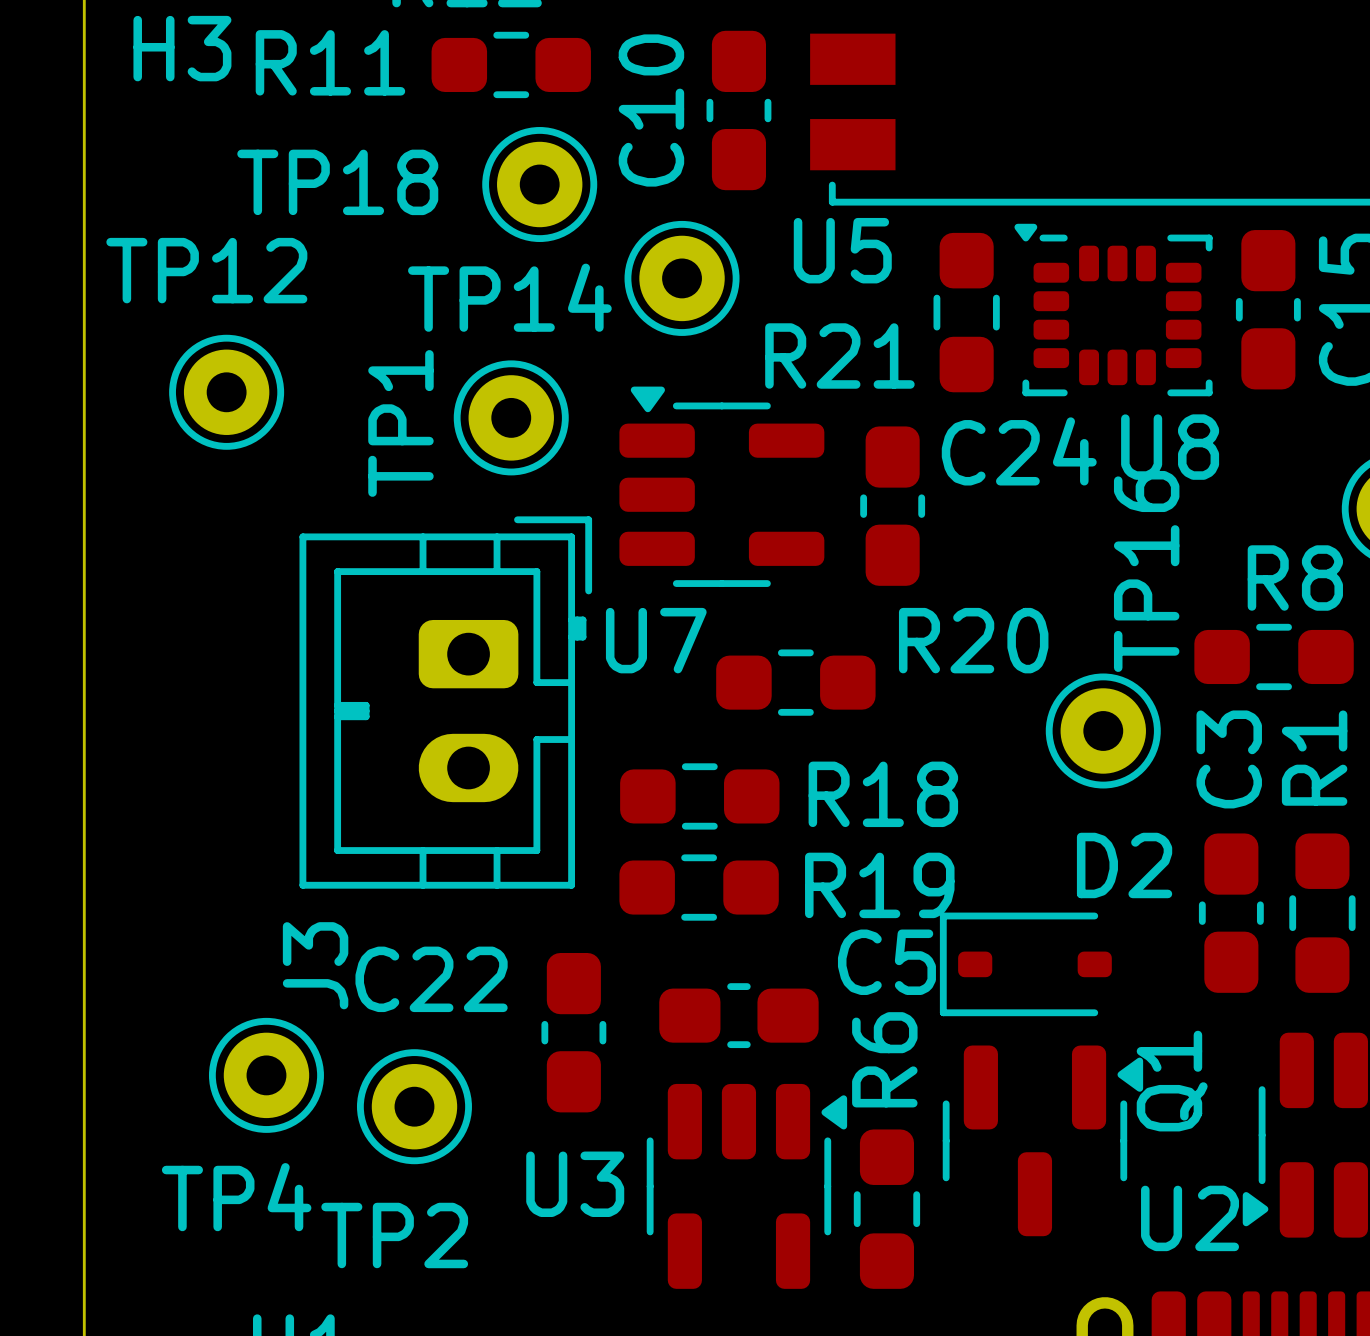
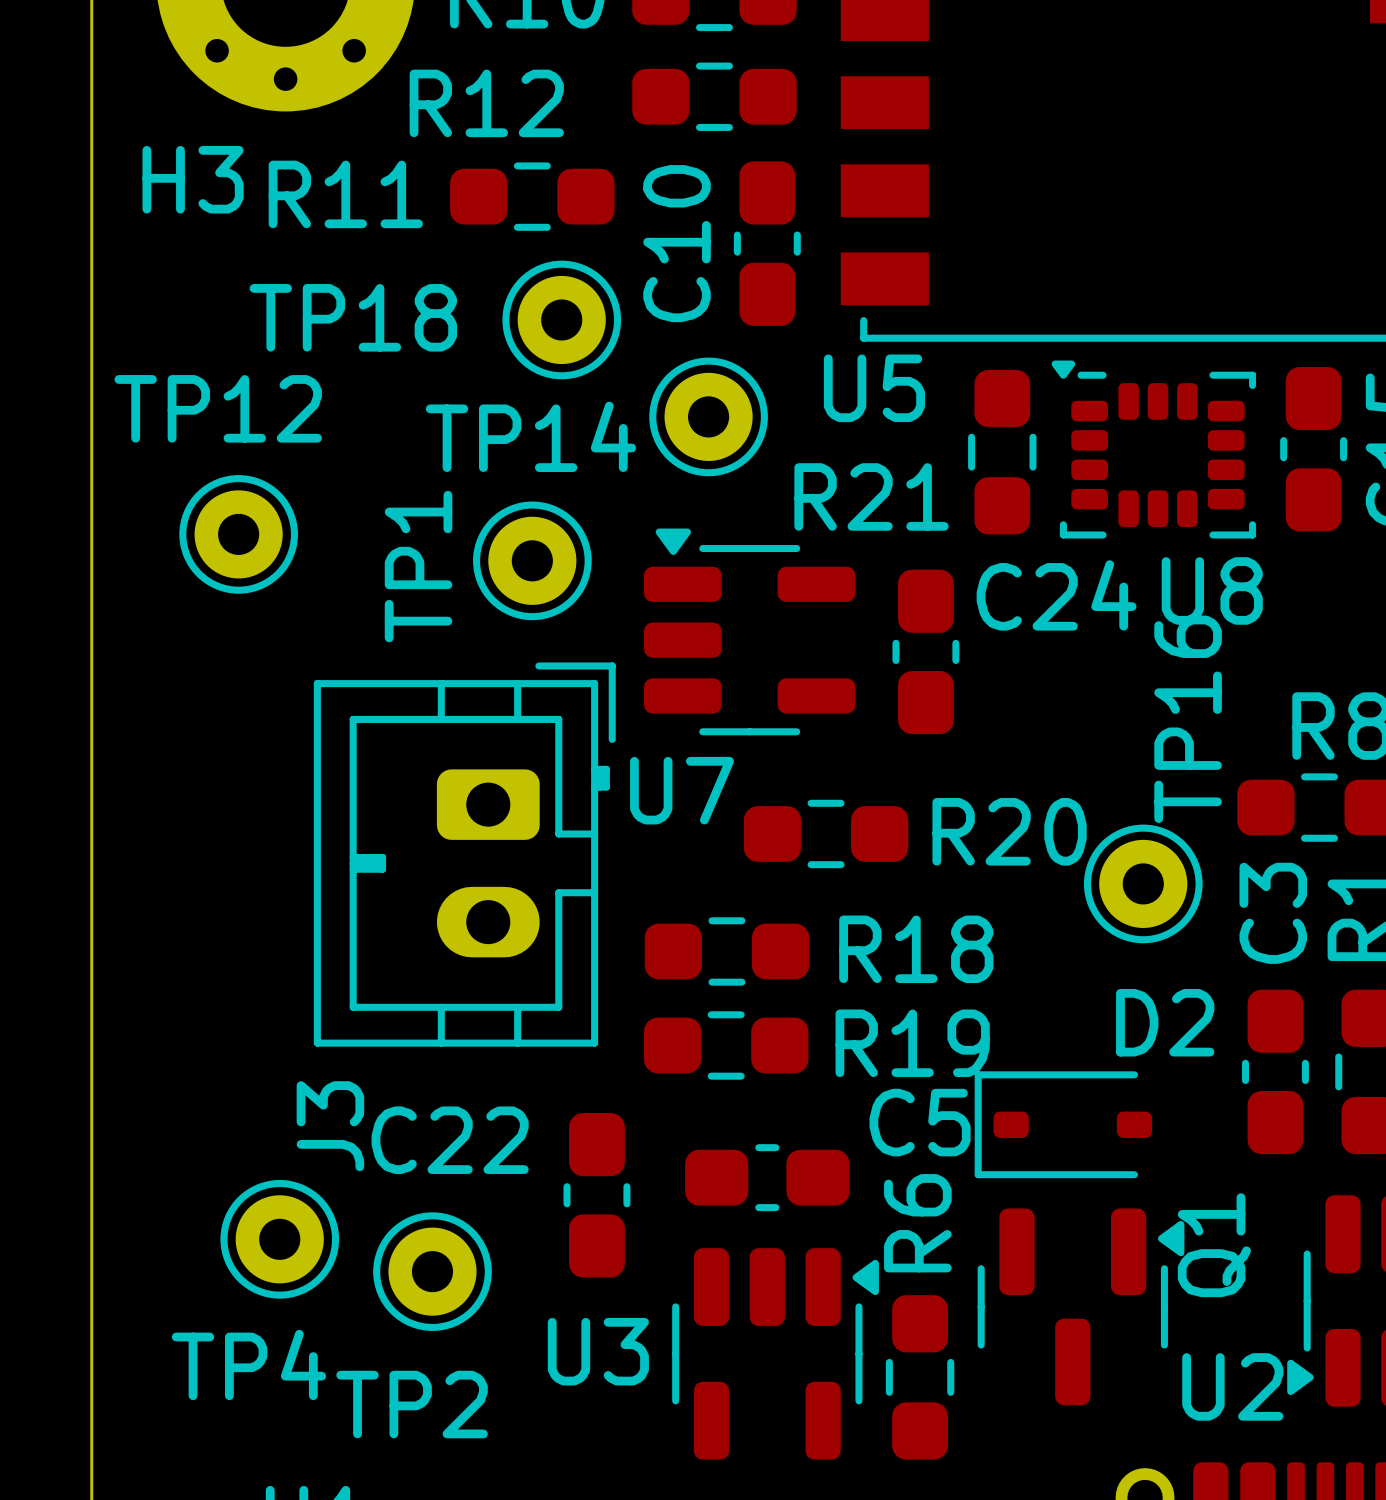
R20 name position: R20 (973, 640) -> R20 (1009, 831)

